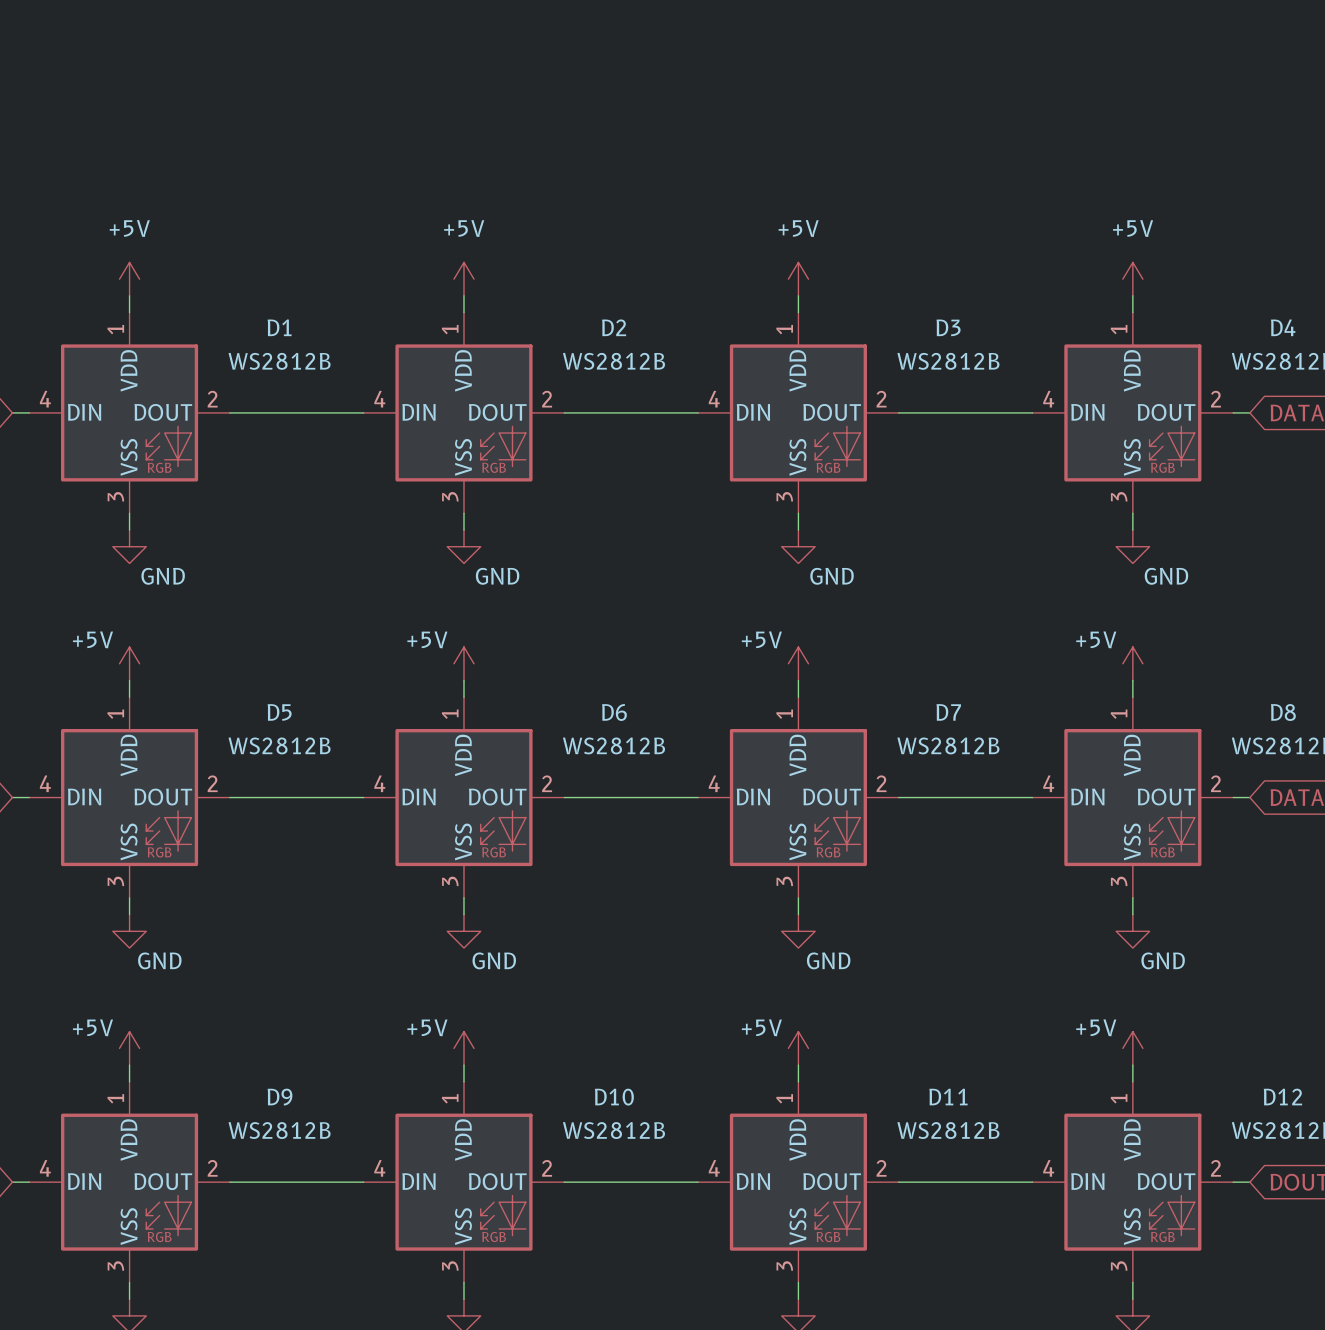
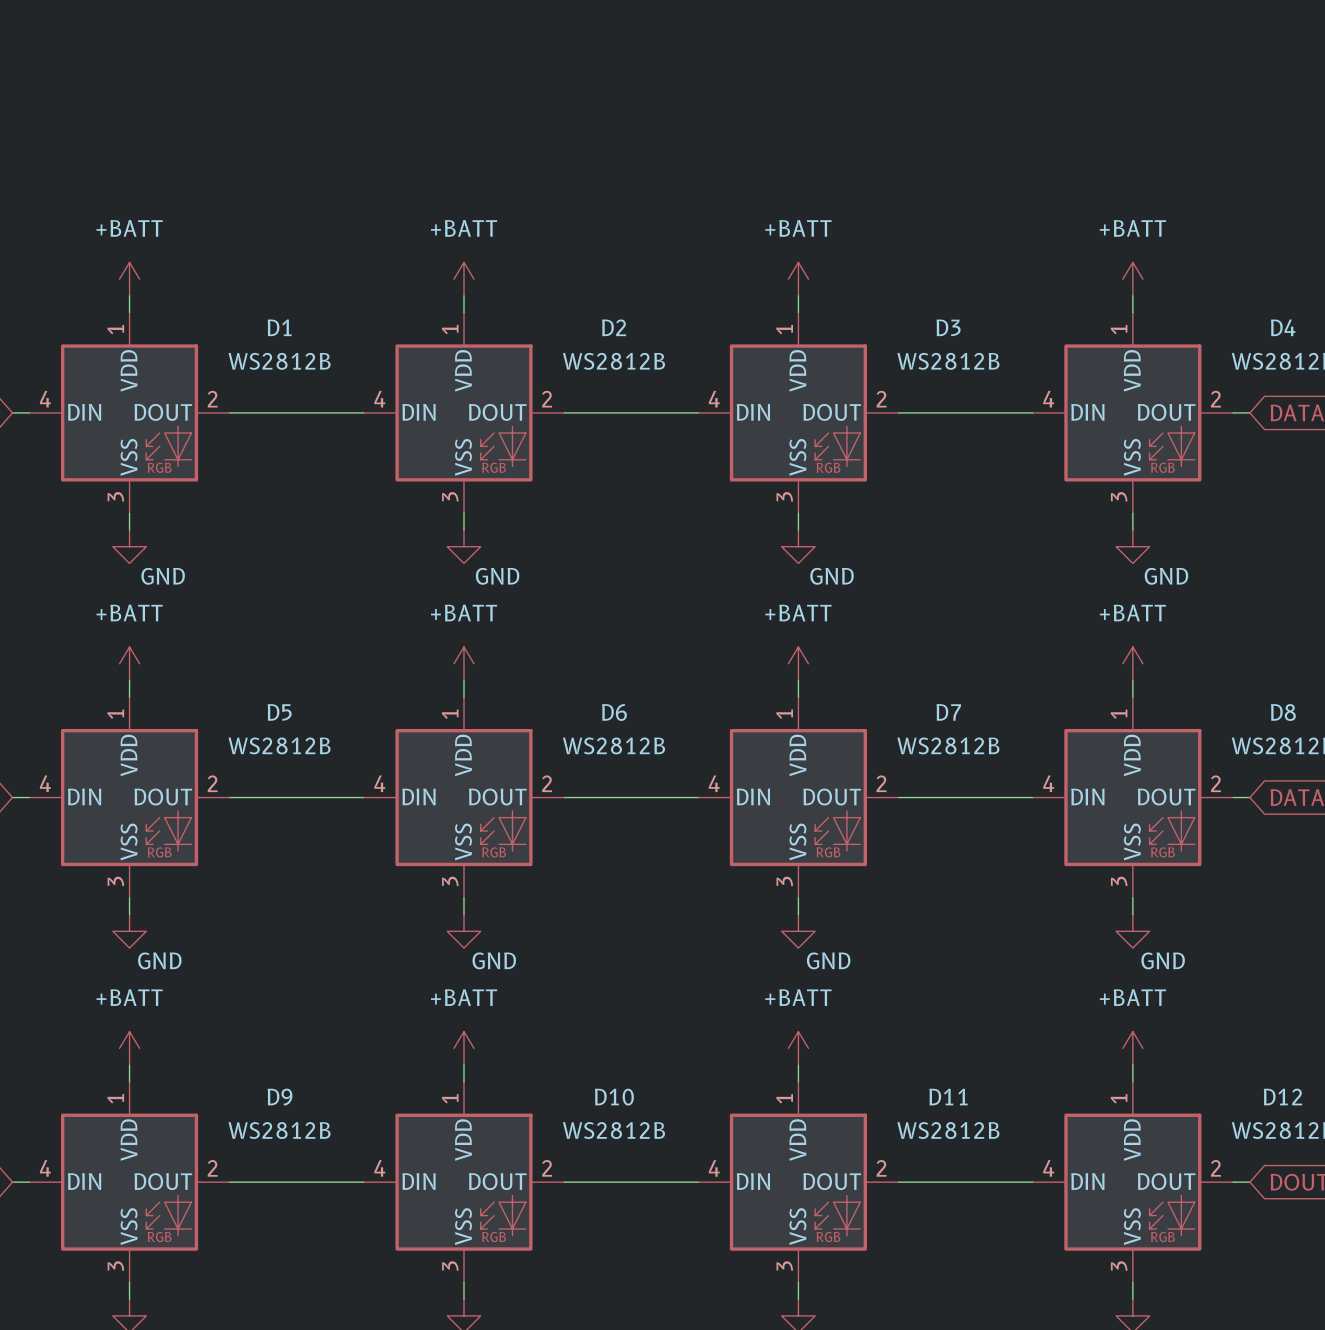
power symbol: +5V (129, 279) -> +BATT (129, 279)
power symbol: +5V (463, 279) -> +BATT (463, 279)
power symbol: +5V (798, 279) -> +BATT (798, 279)
power symbol: +5V (1132, 279) -> +BATT (1132, 279)
power symbol: +5V (129, 663) -> +BATT (129, 663)
power symbol: +5V (463, 663) -> +BATT (463, 663)
power symbol: +5V (798, 663) -> +BATT (798, 663)
power symbol: +5V (1132, 663) -> +BATT (1132, 663)
power symbol: +5V (129, 1048) -> +BATT (129, 1048)
power symbol: +5V (463, 1048) -> +BATT (463, 1048)
power symbol: +5V (798, 1048) -> +BATT (798, 1048)
power symbol: +5V (1132, 1048) -> +BATT (1132, 1048)

